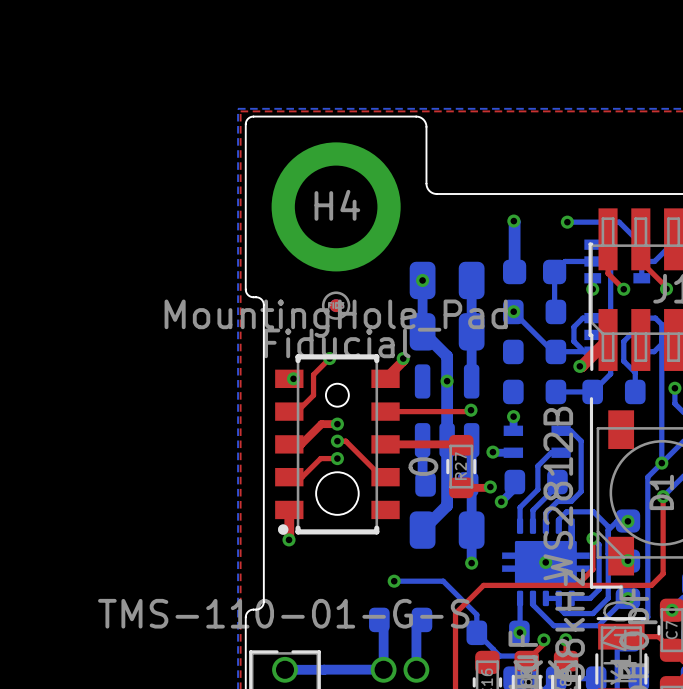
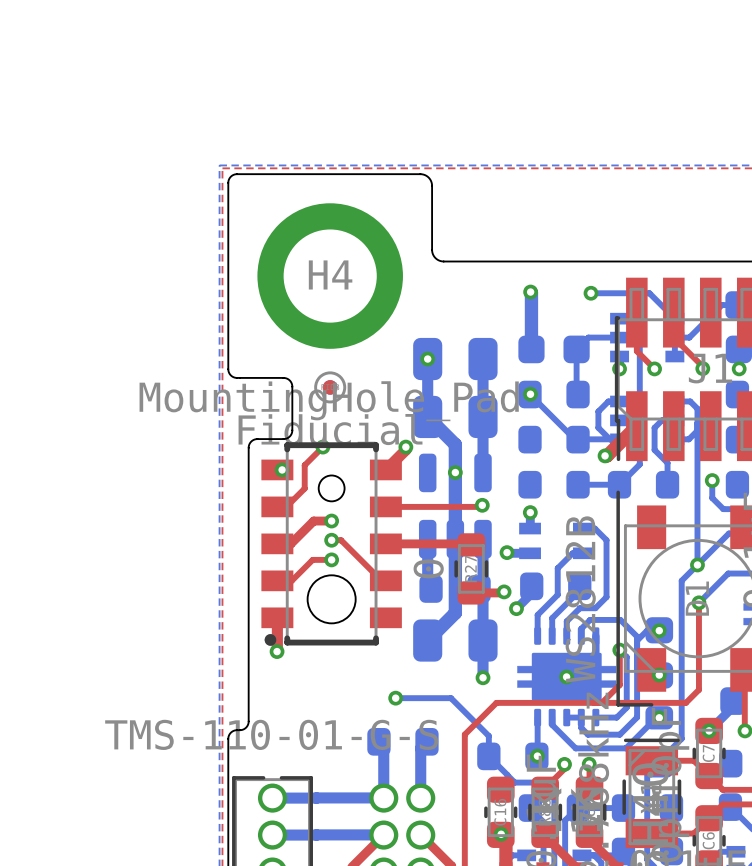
board edge: (256, 297) (260, 298) (263, 303) (263, 359) -> (239, 377) (284, 378) (289, 380) (292, 385) (292, 430) (290, 435) (284, 439) (255, 439) (250, 442) (248, 447)

